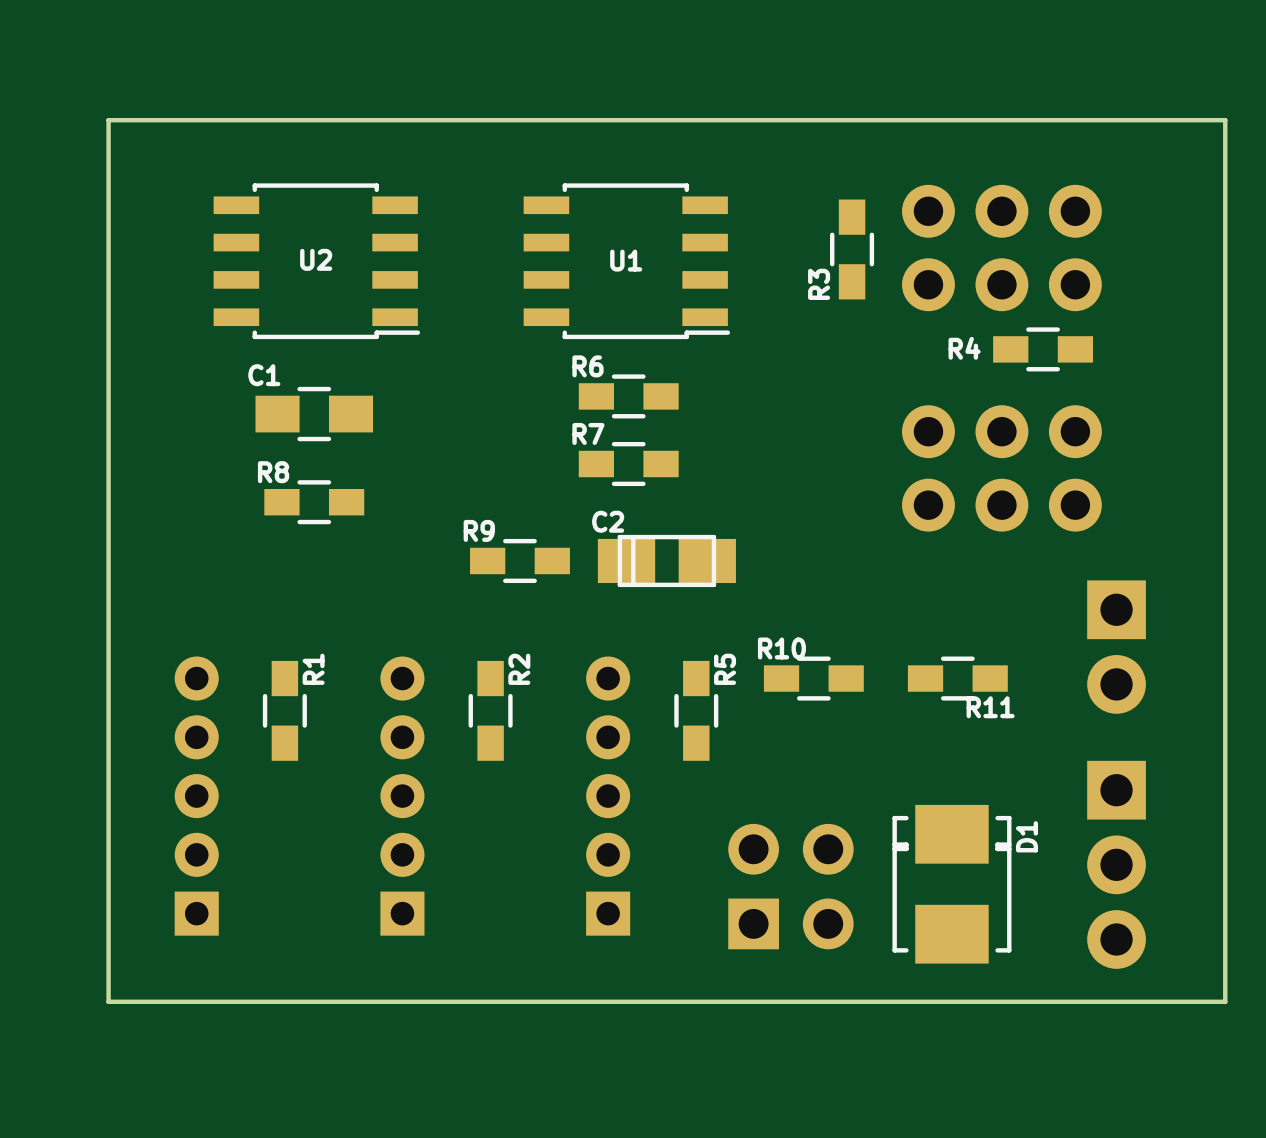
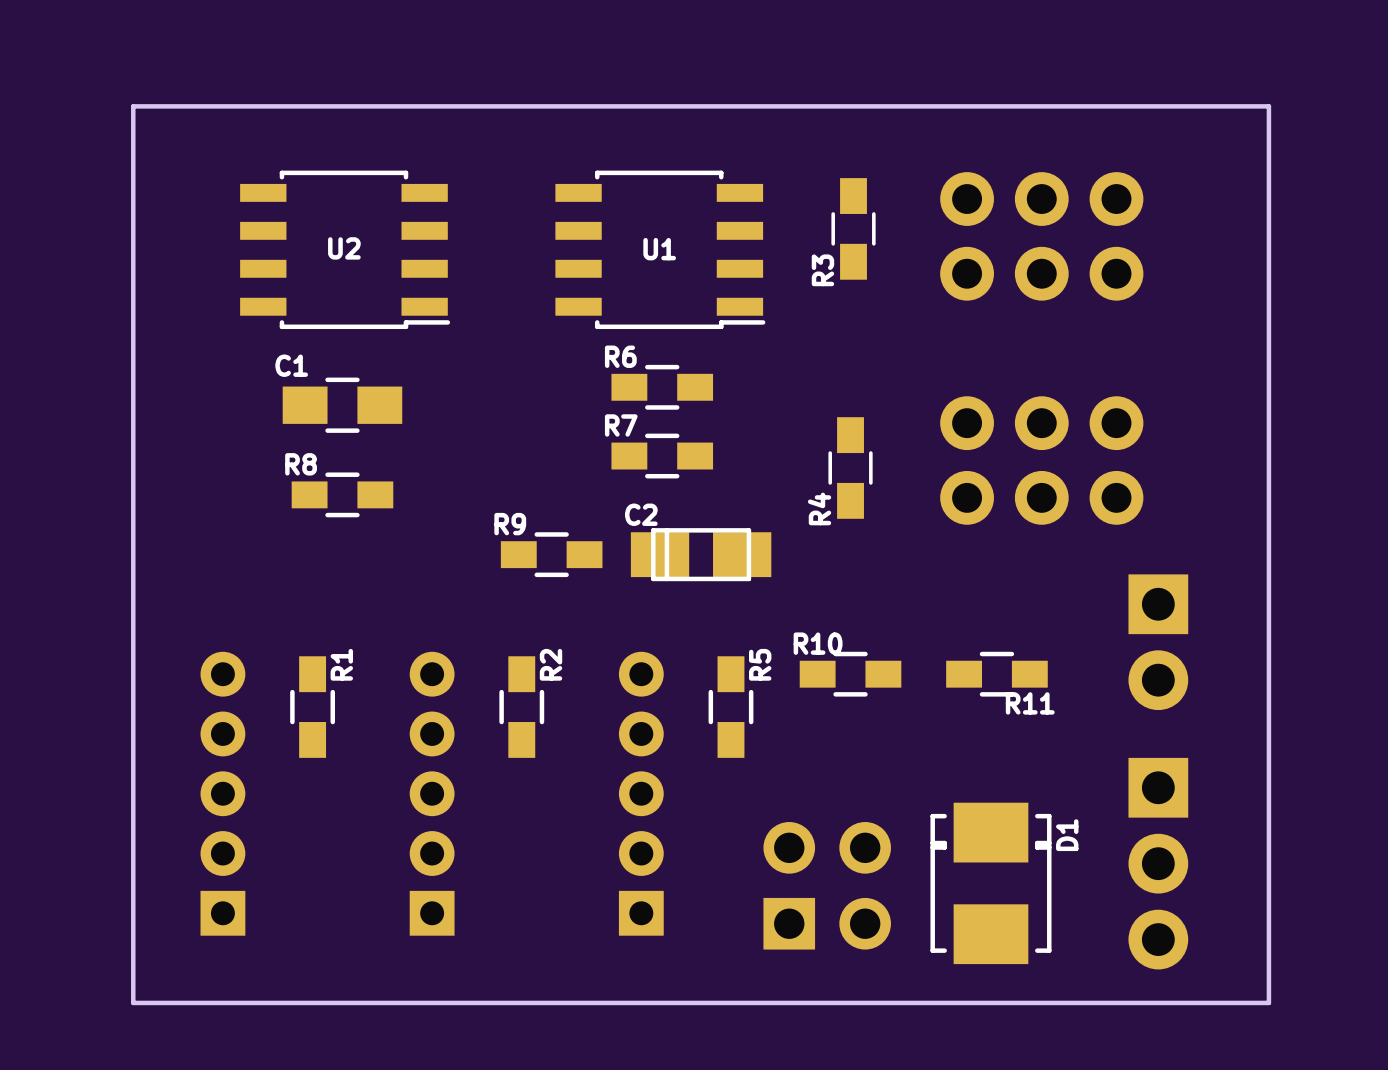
R3 footprint: [830, 199, 875, 300] -> [831, 178, 876, 280]
R4 footprint: [993, 327, 1094, 372] -> [828, 417, 873, 519]
R4 name position: R4 (964, 348) -> R4 (819, 508)

